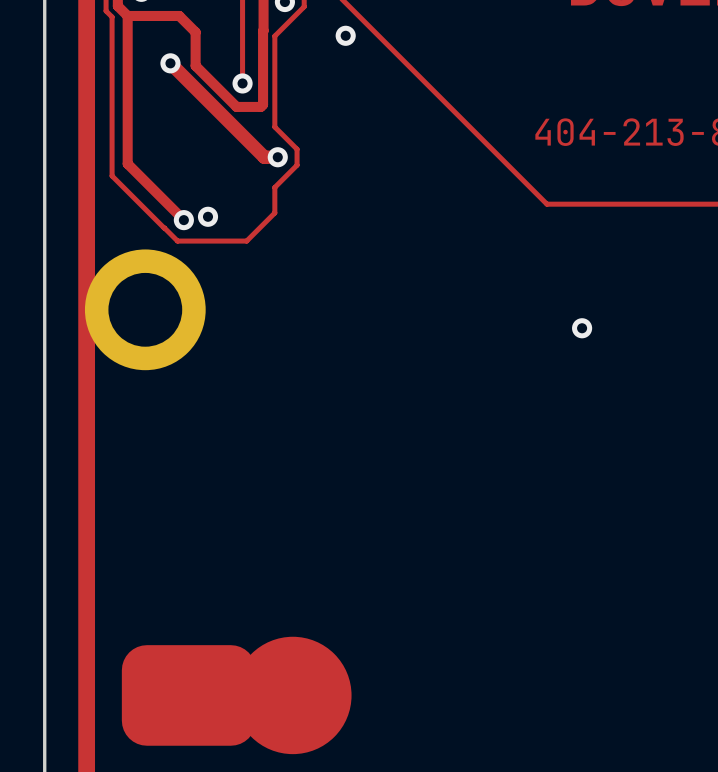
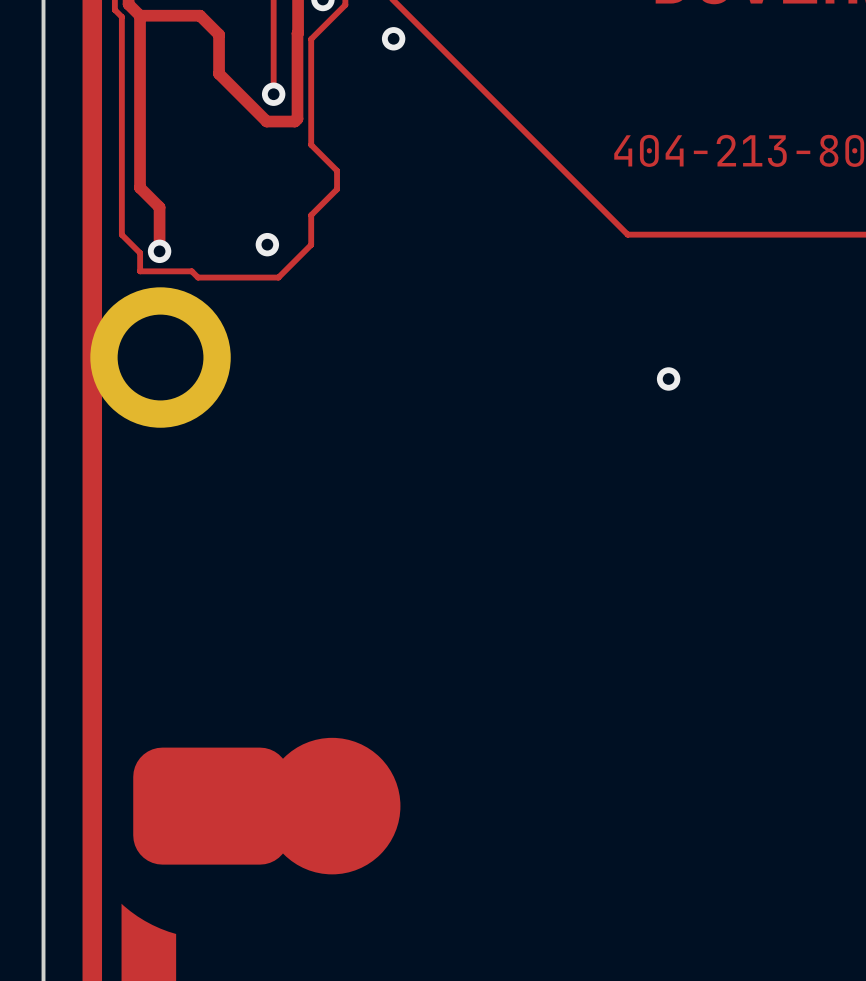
track: (170, 63) (264, 157) (277, 157) -> none
via: (170, 63) -> none
via: (277, 157) -> none
track: (112, 175) (164, 228) -> (121, 201) (121, 234) (140, 253) (140, 271) (191, 271)
track: (144, 180) (183, 220) -> (159, 207) (159, 251)
via: none -> (267, 244)
via: (208, 216) -> none
via: none -> (159, 251)
via: (183, 220) -> none
track: (164, 228) (172, 235) -> none

